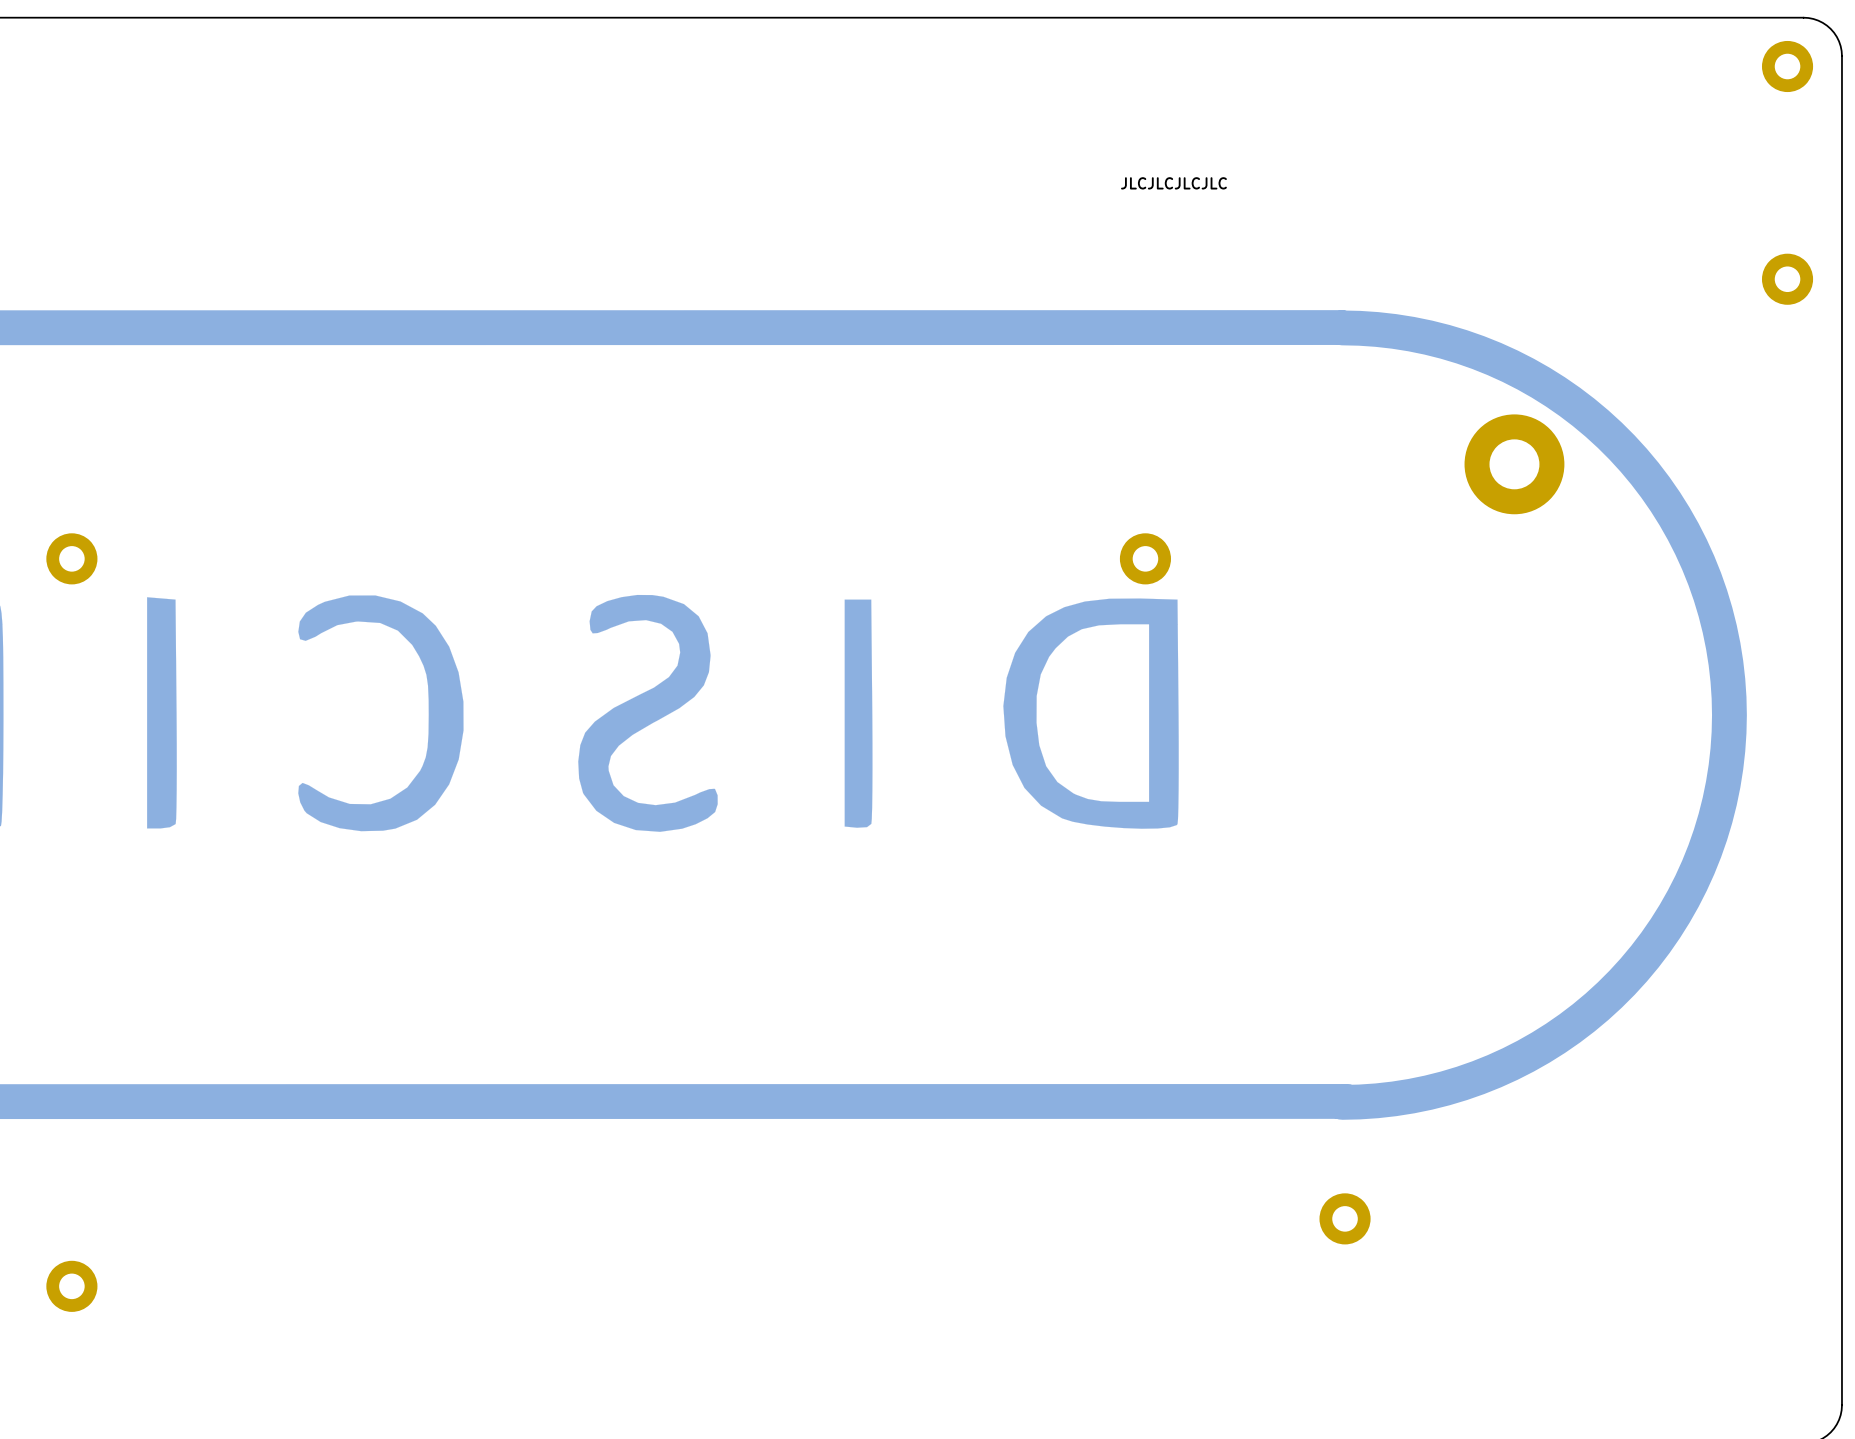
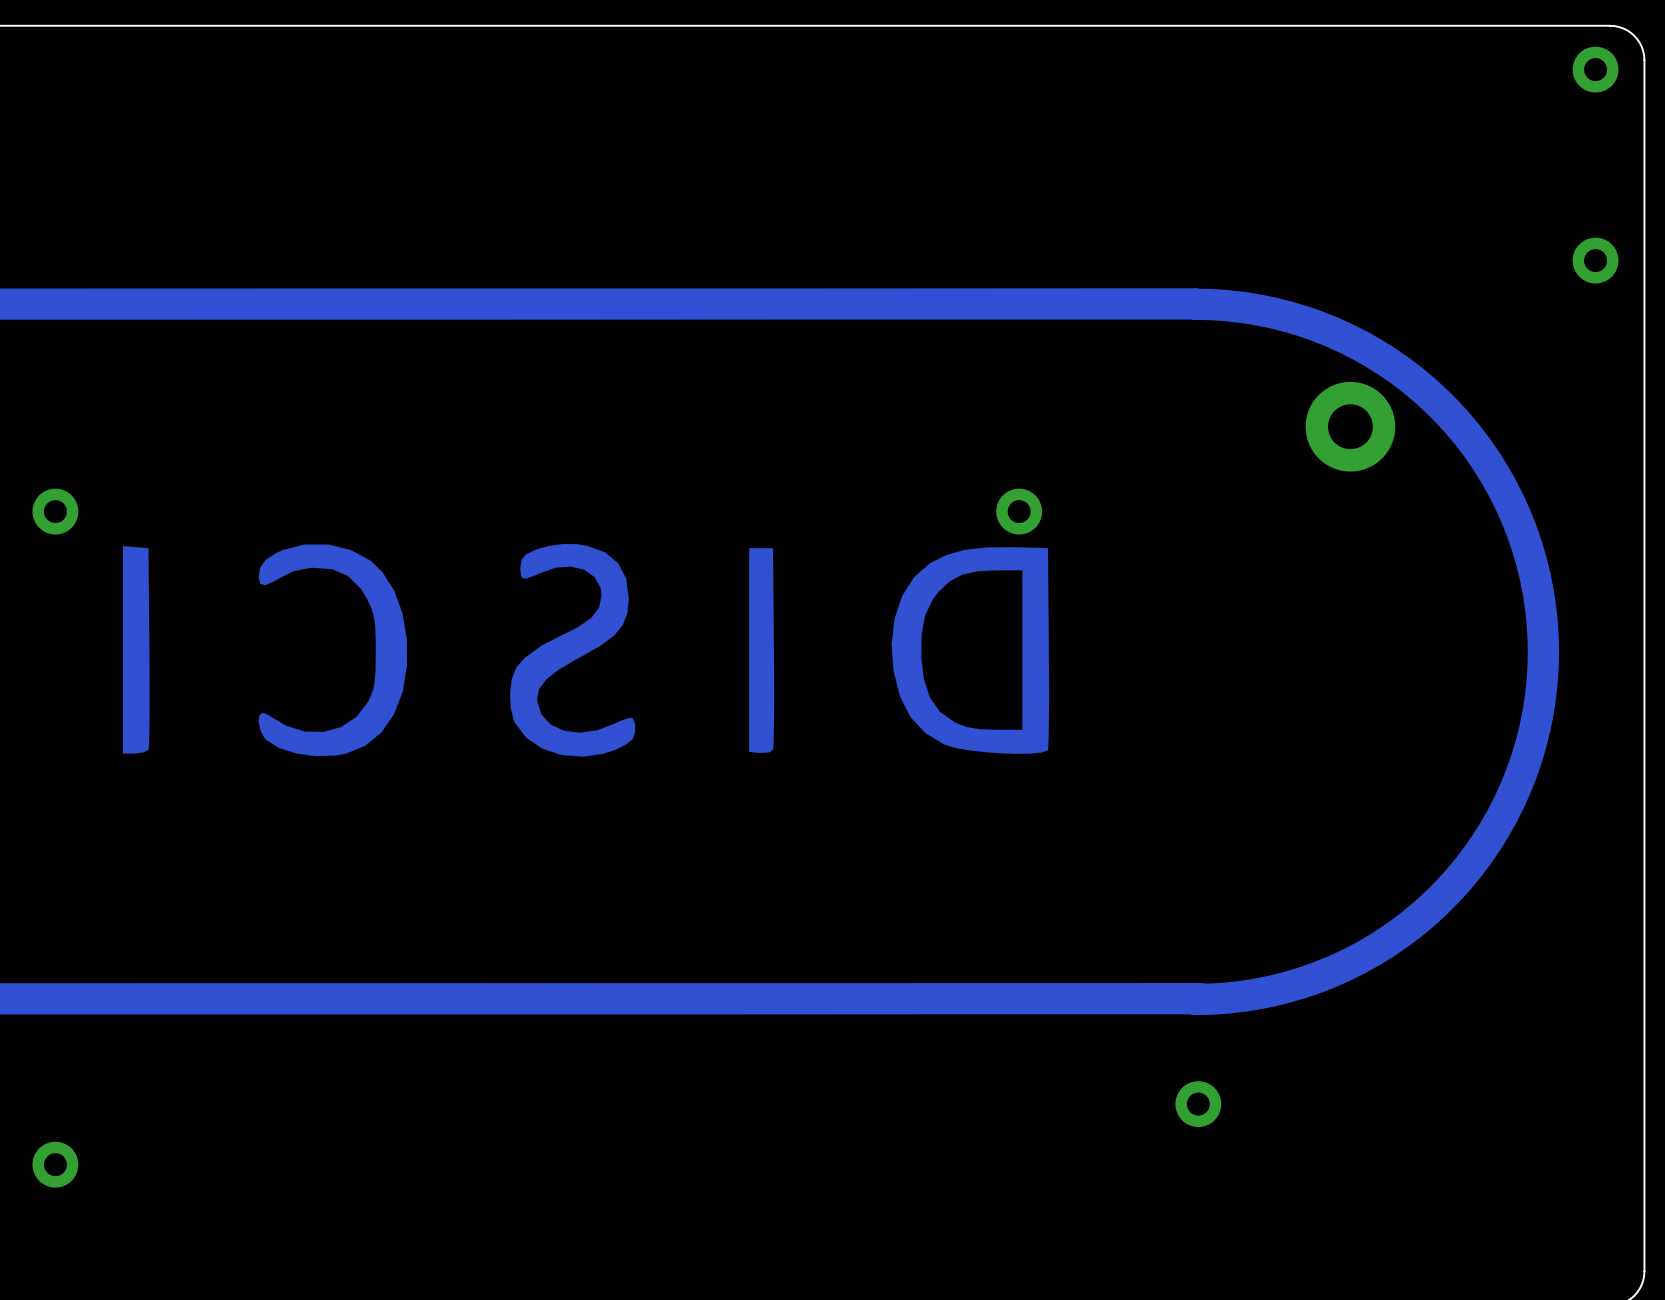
text: JLCJLCJLCJLC (1173, 183) -> none

